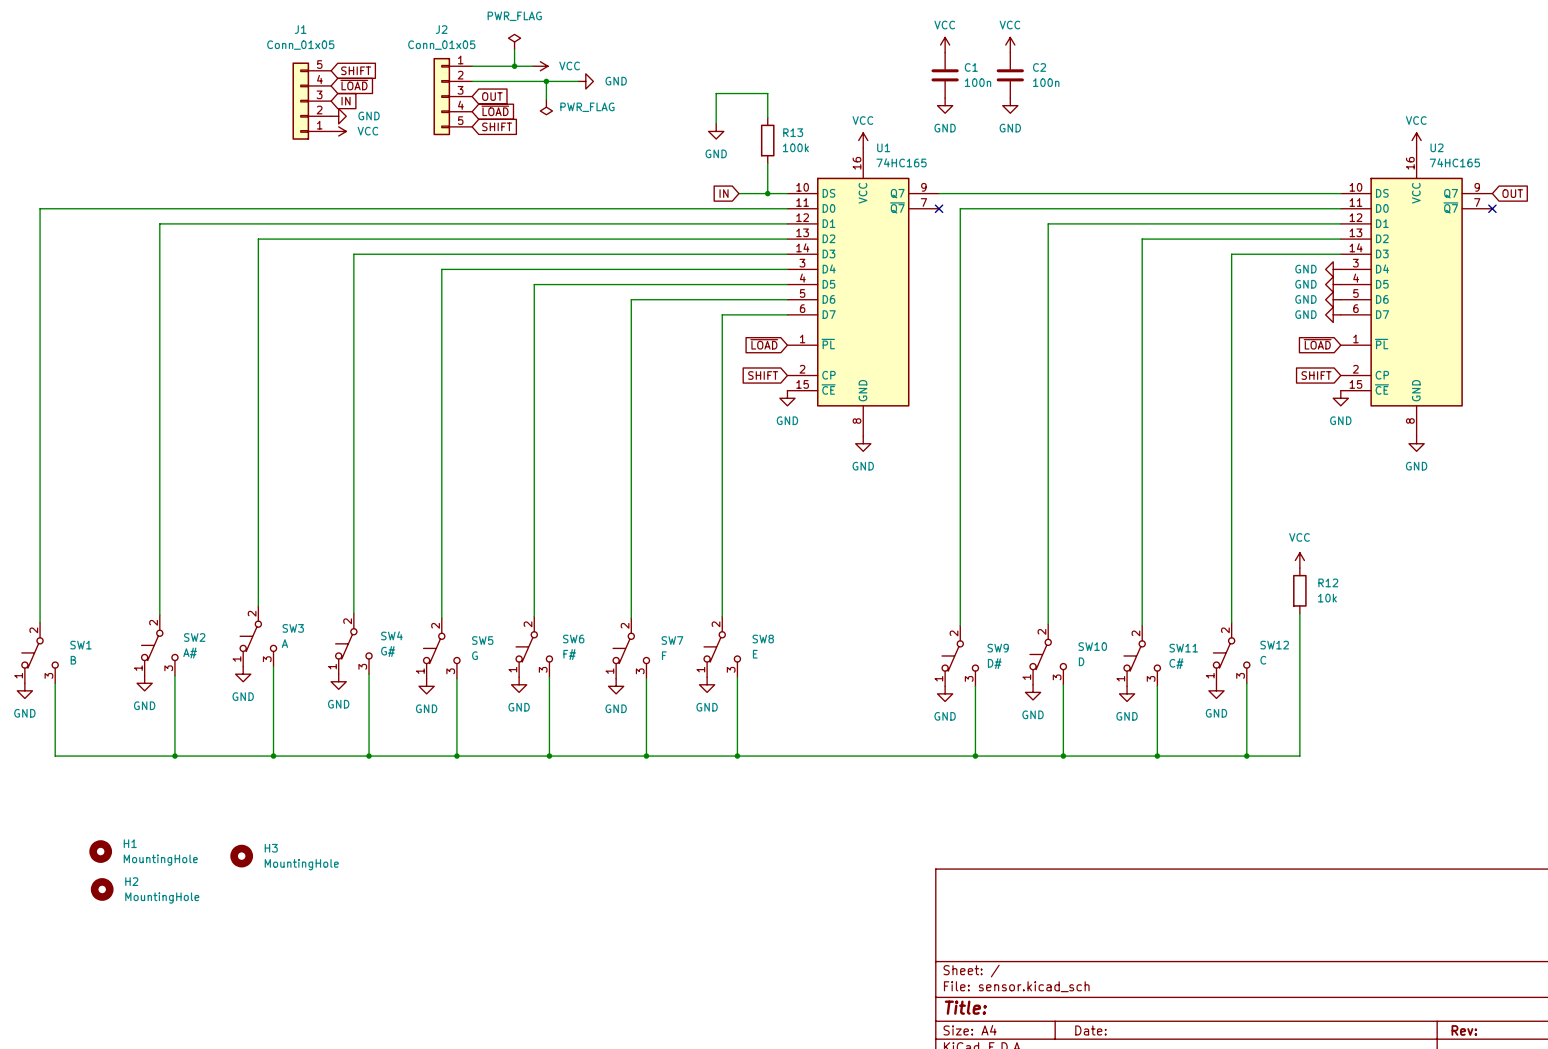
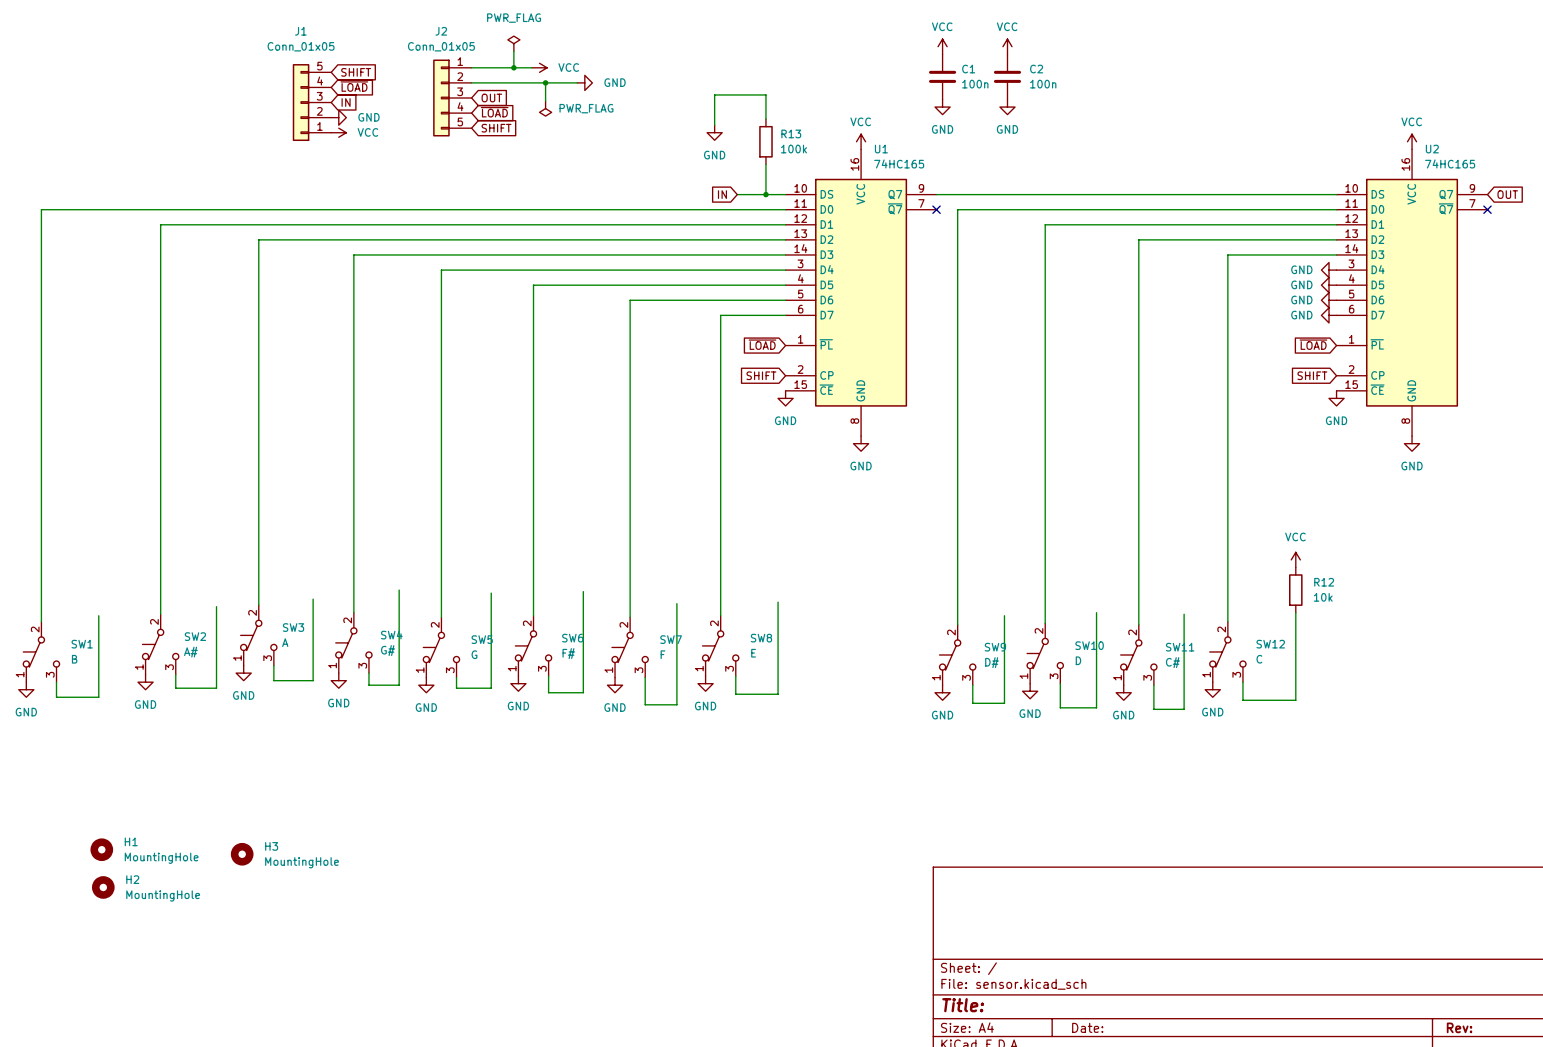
wire: (273, 681) (273, 756) -> (273, 680) (313, 680) (313, 599)
wire: (369, 686) (369, 756) -> (368, 685) (399, 685) (399, 590)
wire: (174, 689) (174, 756) -> (175, 688) (216, 688) (216, 606)
wire: (456, 689) (456, 756) -> (456, 688) (491, 688) (491, 593)
wire: (549, 693) (549, 756) -> (548, 692) (583, 692) (583, 591)
wire: (737, 695) (737, 756) -> (735, 694) (778, 694) (778, 602)
wire: (55, 698) (55, 756) (1299, 756) (1299, 701) -> (56, 697) (98, 697) (98, 615)
wire: (1246, 701) (1246, 756) -> (1242, 700) (1295, 700)
wire: (975, 704) (975, 756) -> (972, 703) (1004, 703) (1004, 615)
wire: (646, 706) (646, 756) -> (645, 704) (676, 704) (676, 603)
wire: (1063, 709) (1063, 756) -> (1060, 707) (1096, 707) (1096, 612)
wire: (1157, 710) (1157, 756) -> (1153, 709) (1184, 709) (1184, 614)
junction: (174, 756) -> none
junction: (273, 756) -> none
junction: (369, 756) -> none
junction: (456, 756) -> none
junction: (549, 756) -> none
junction: (646, 756) -> none
junction: (737, 756) -> none
junction: (975, 756) -> none
junction: (1063, 756) -> none
junction: (1157, 756) -> none
junction: (1246, 756) -> none

